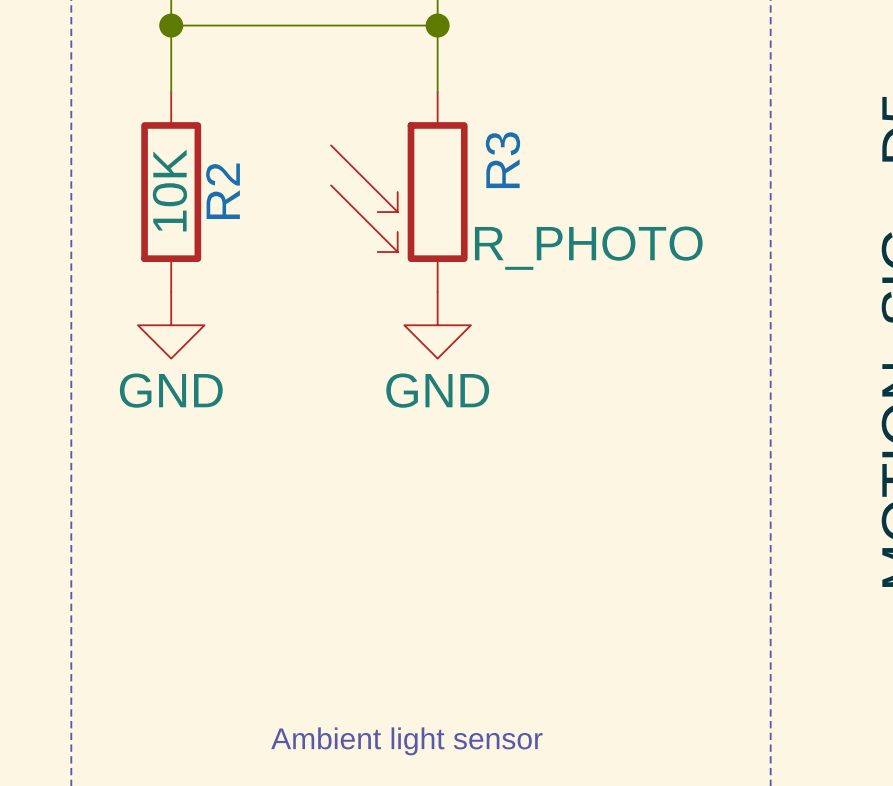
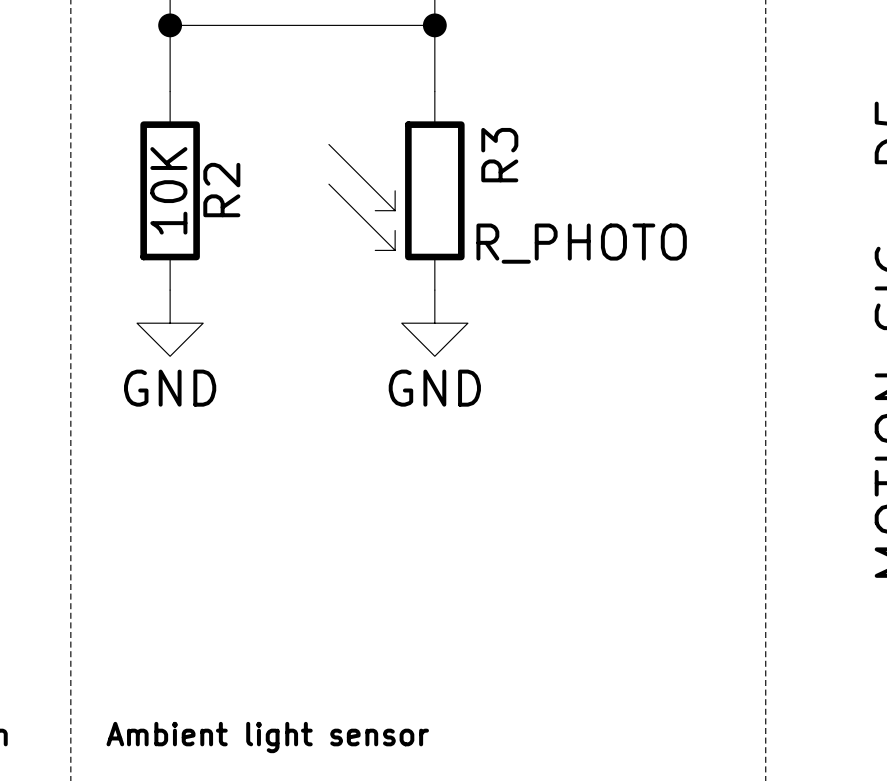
text position: Ambient light sensor (406, 741) -> Ambient light sensor (267, 737)

